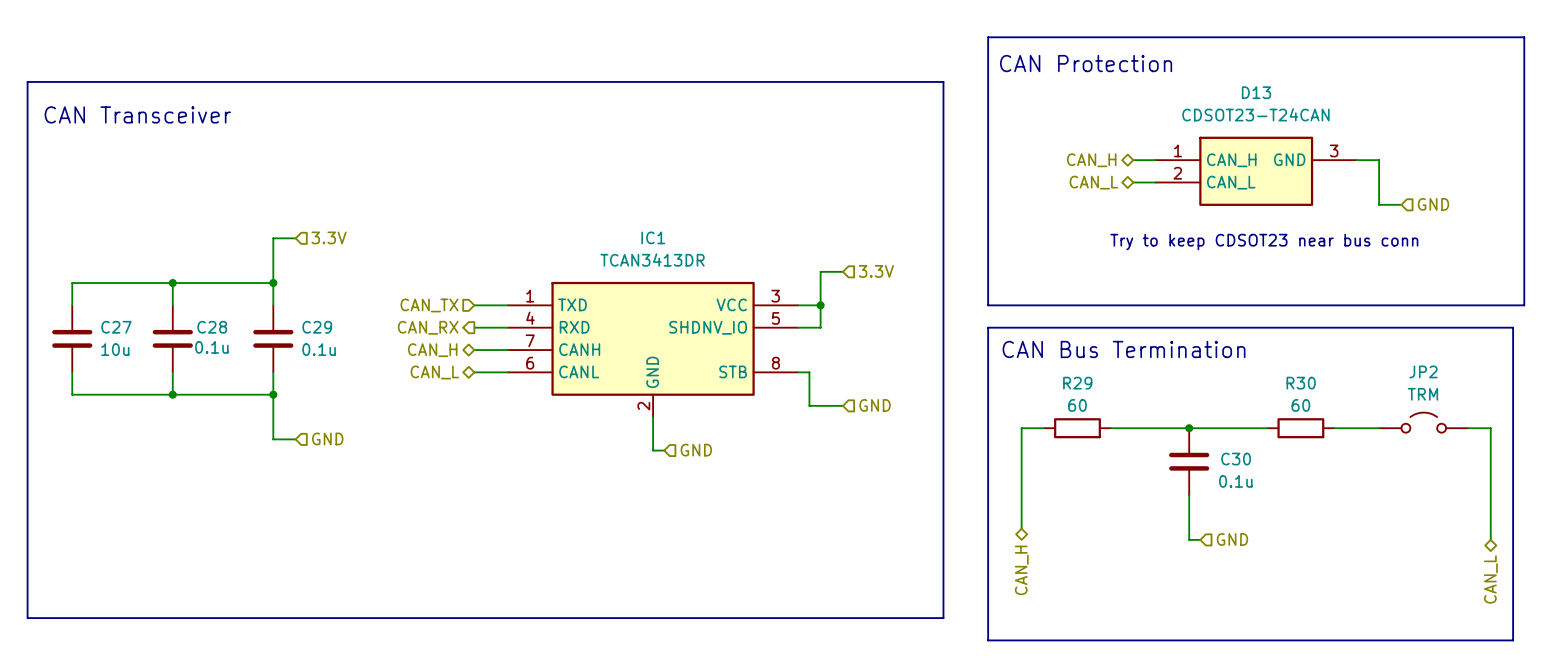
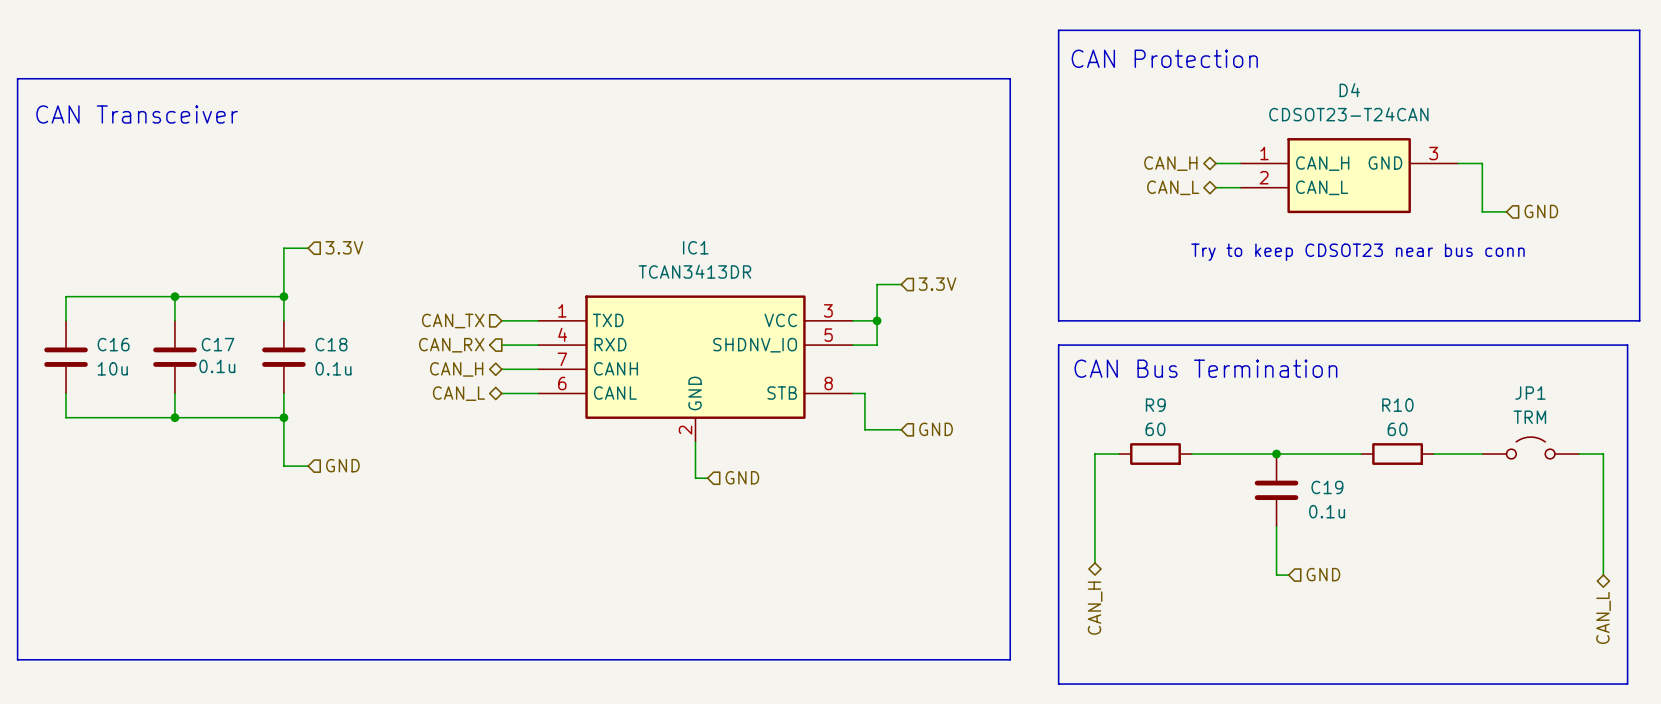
D13 name: D13 (1256, 92) -> D4 (1349, 90)
C27 name: C27 (116, 327) -> C16 (113, 344)
C28 name: C28 (212, 327) -> C17 (218, 344)
C29 name: C29 (317, 327) -> C18 (331, 344)
JP2 name: JP2 (1423, 371) -> JP1 (1530, 393)
R29 name: R29 (1077, 383) -> R9 (1155, 405)
R30 name: R30 (1301, 383) -> R10 (1397, 405)
C30 name: C30 (1236, 459) -> C19 (1327, 487)

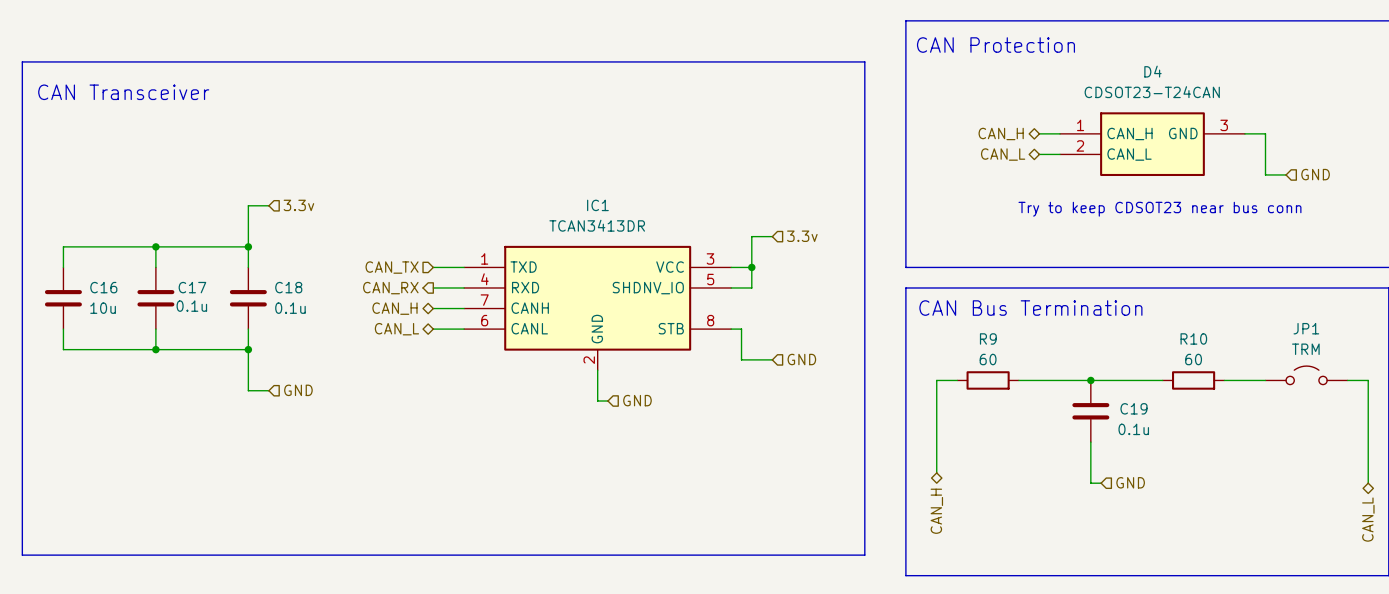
hierarchical label: 3.3V (344, 247) -> 3.3v (298, 205)
hierarchical label: 3.3V (937, 284) -> 3.3v (802, 236)

